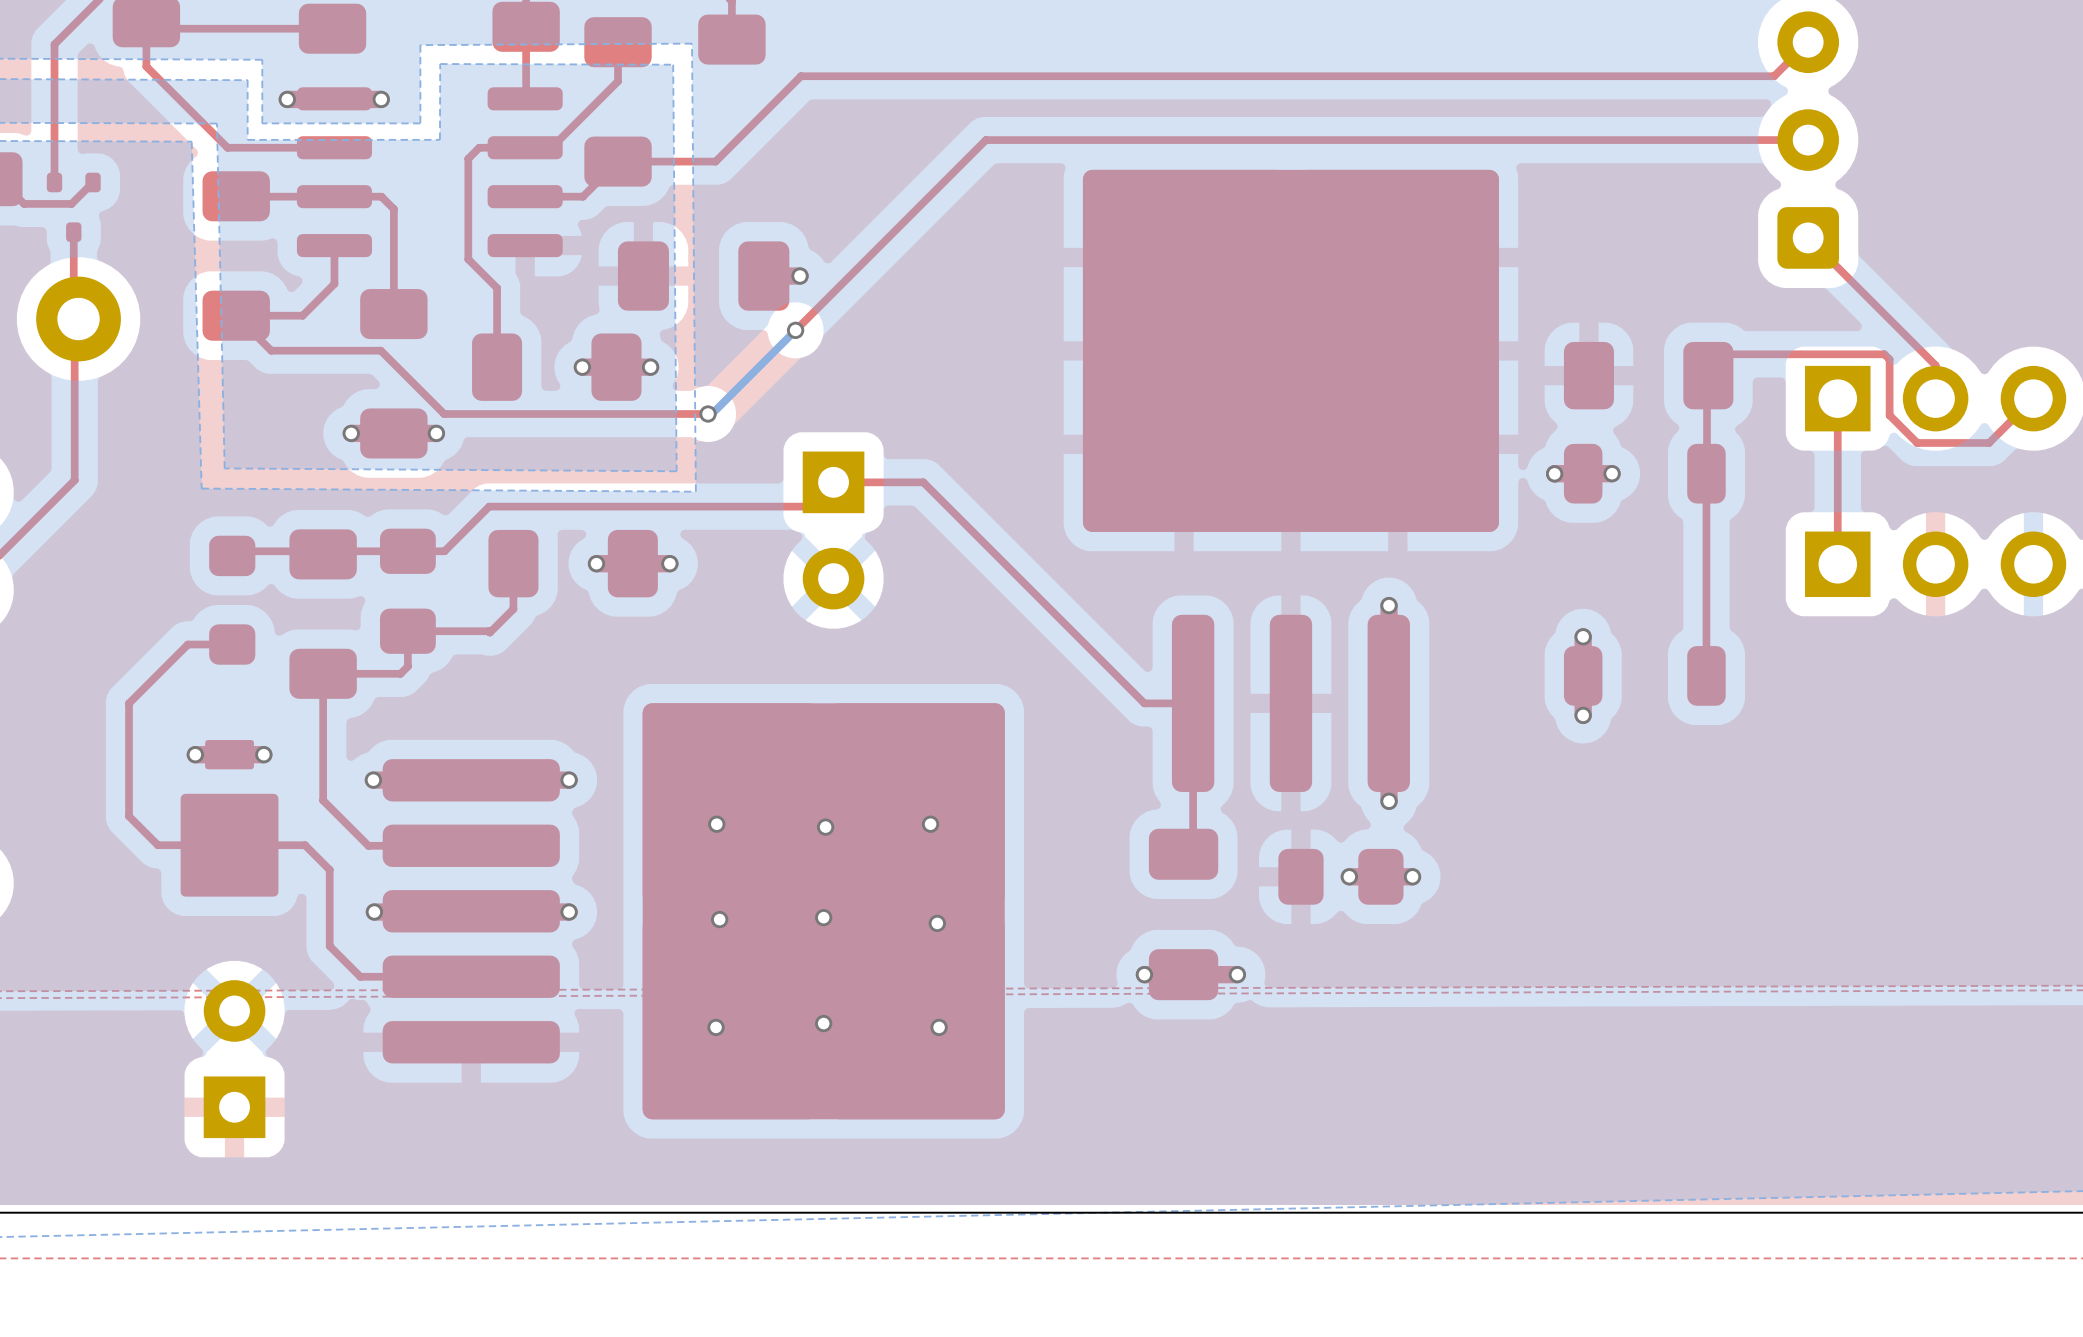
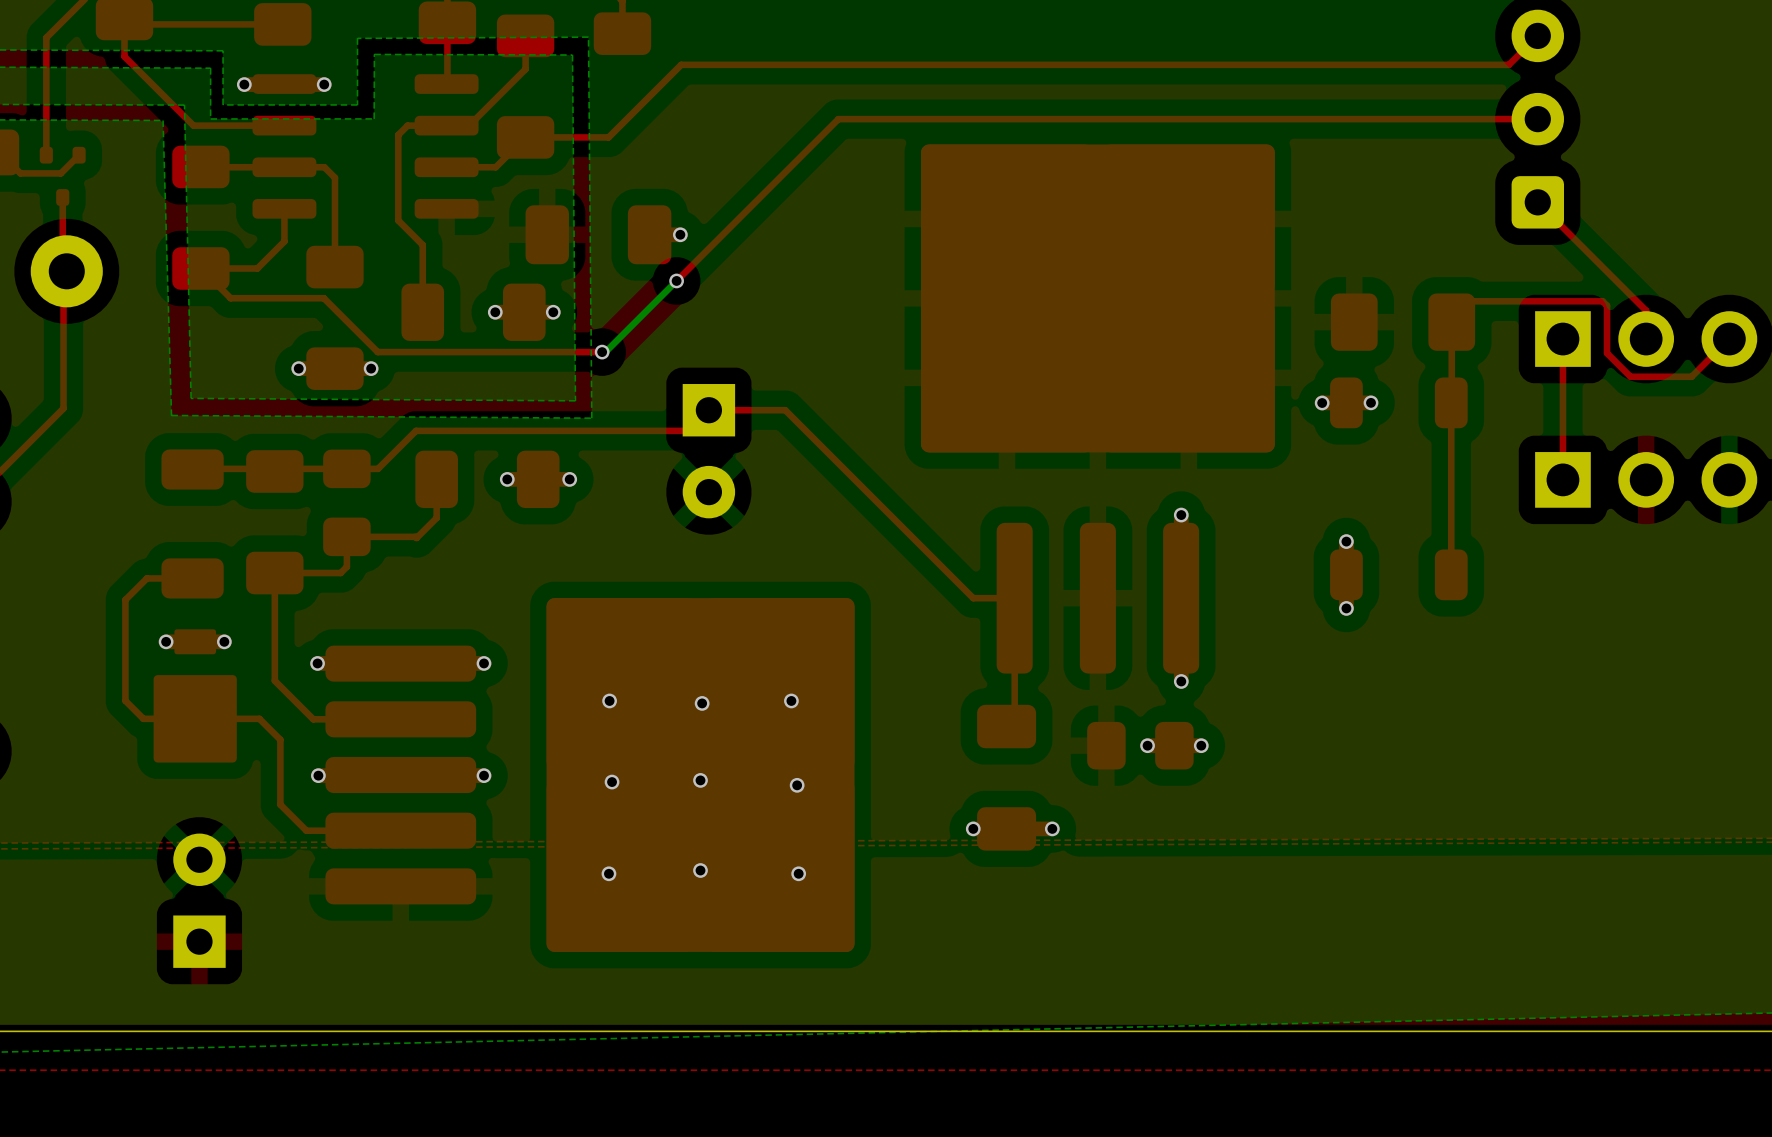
part footprint: [1563, 341, 1734, 410] -> [1330, 293, 1476, 351]
part footprint: [209, 535, 256, 665] -> [161, 449, 224, 599]
top track: (232, 644) (187, 644) (129, 703) (129, 816) (157, 845) (168, 845) -> (192, 578) (146, 578) (125, 599) (125, 700) (143, 718)

